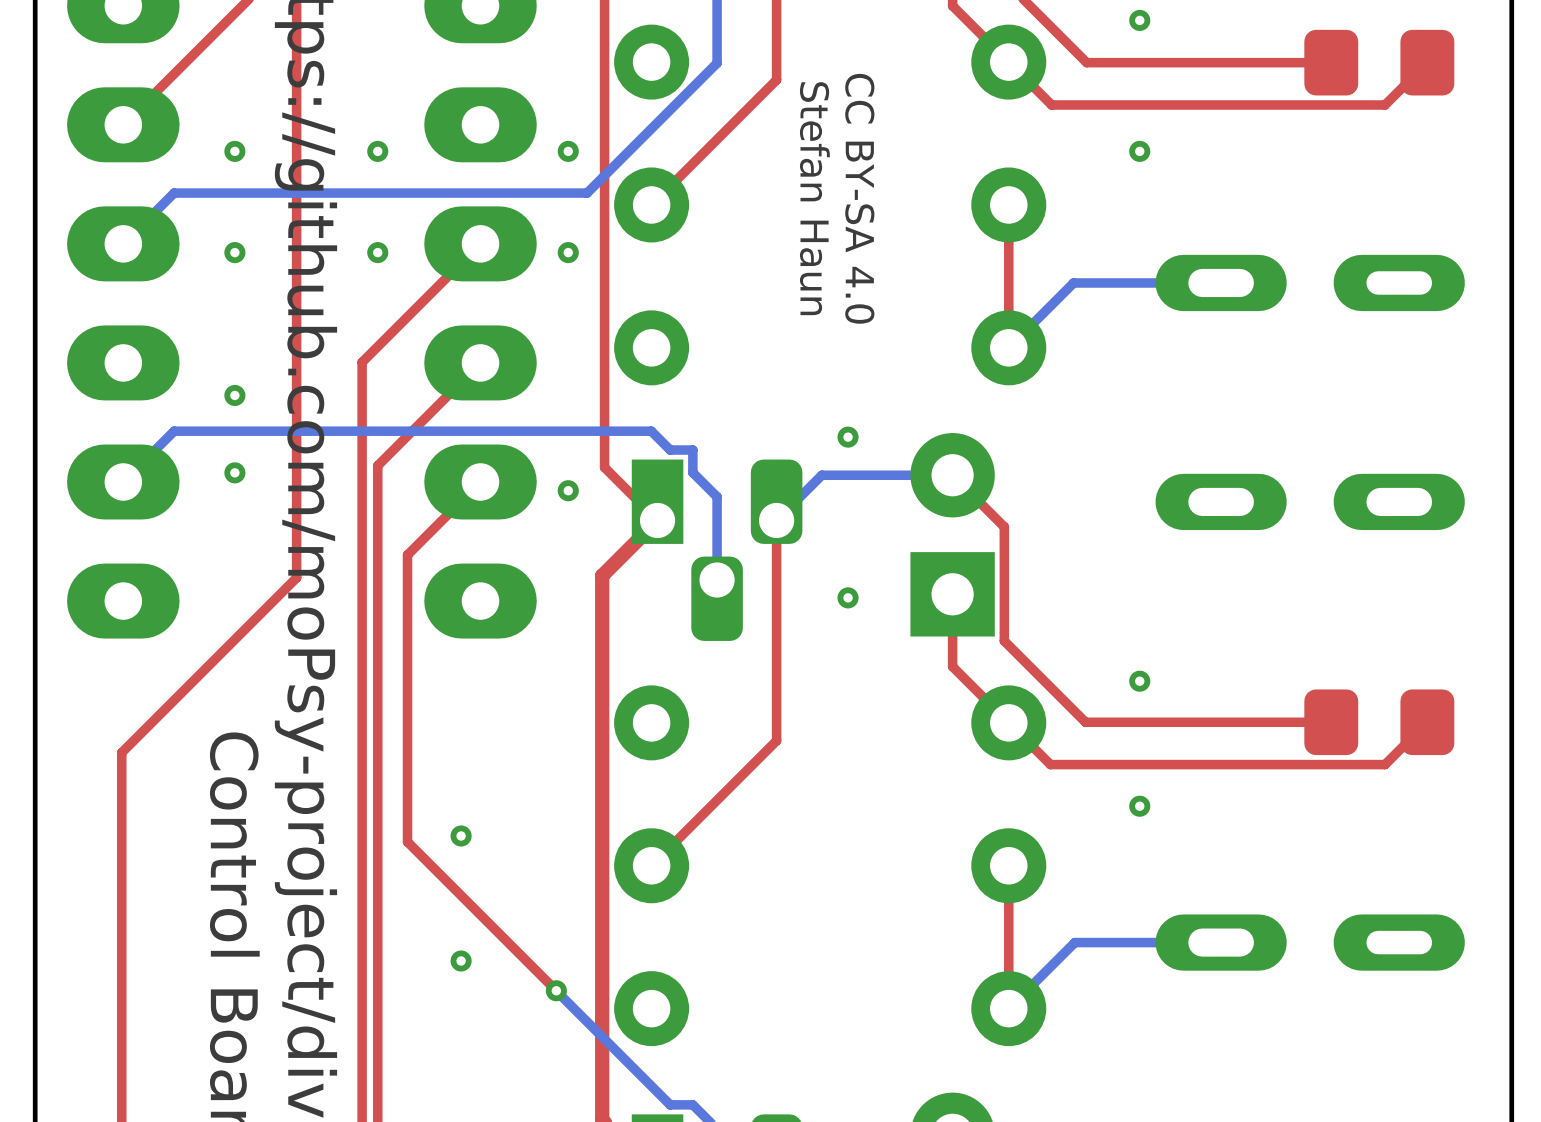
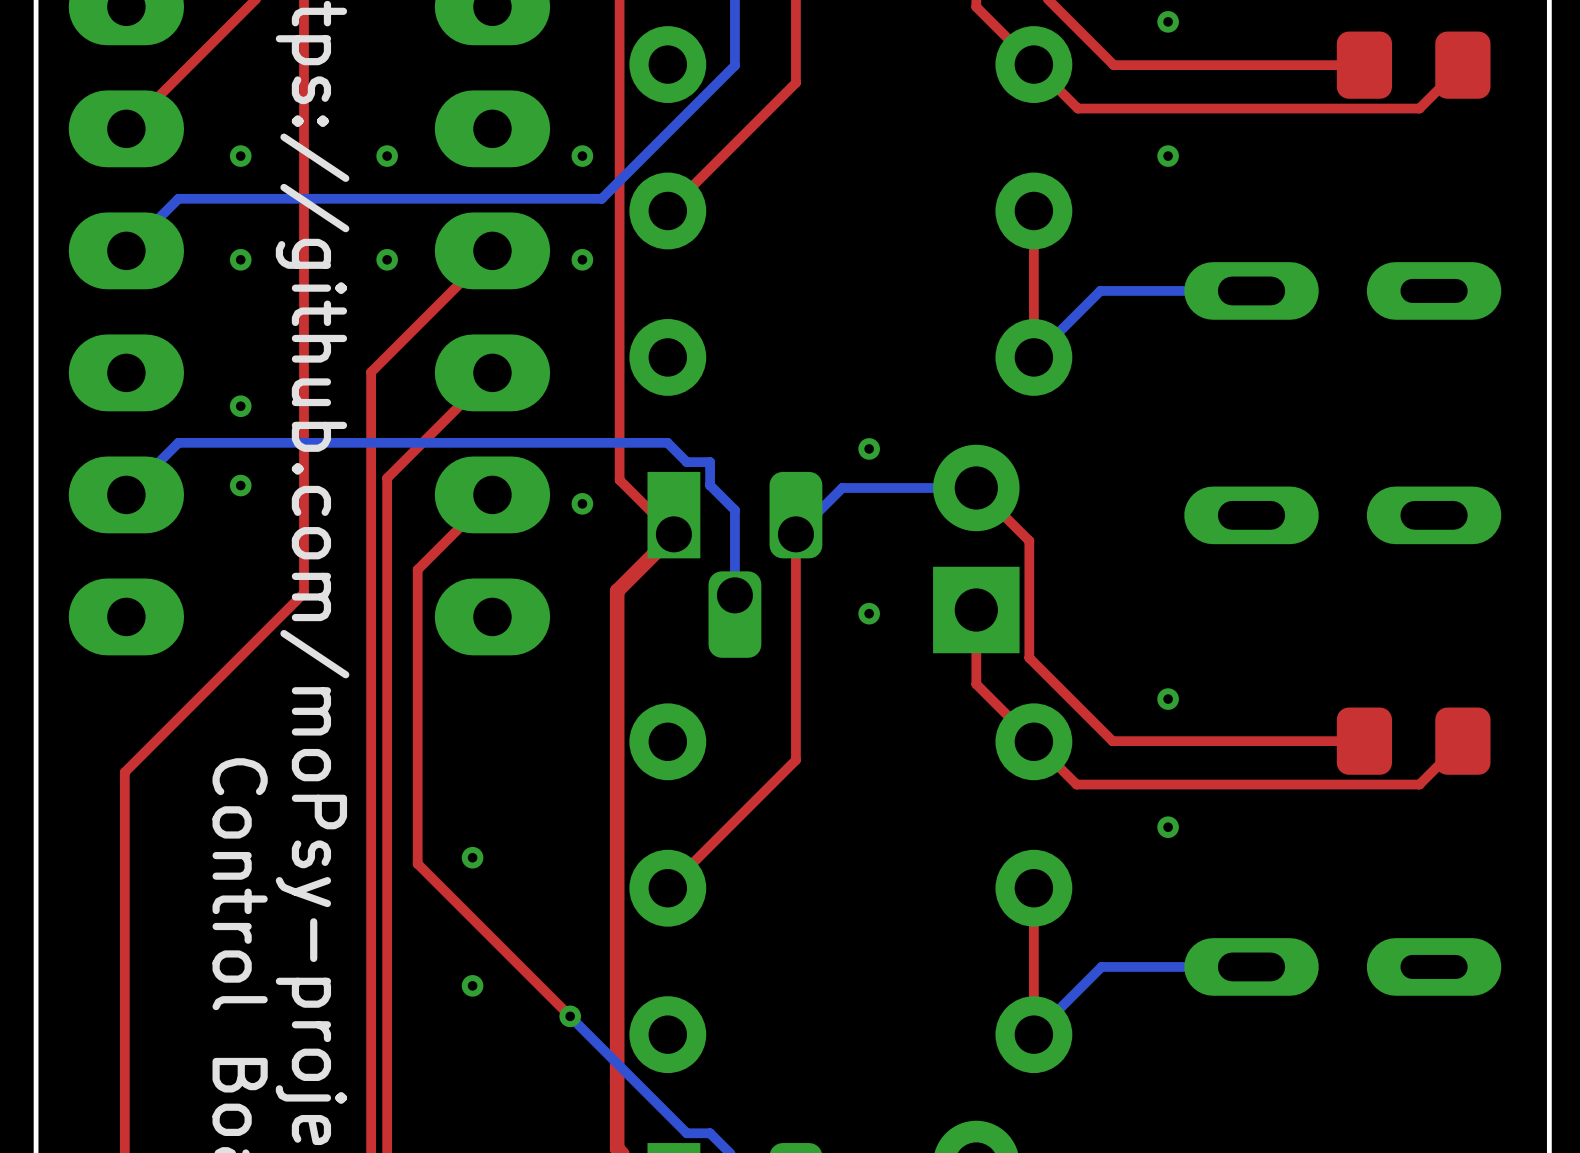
text: Stefan Haun (814, 198) -> none
text: CC BY-SA 4.0 (859, 198) -> none

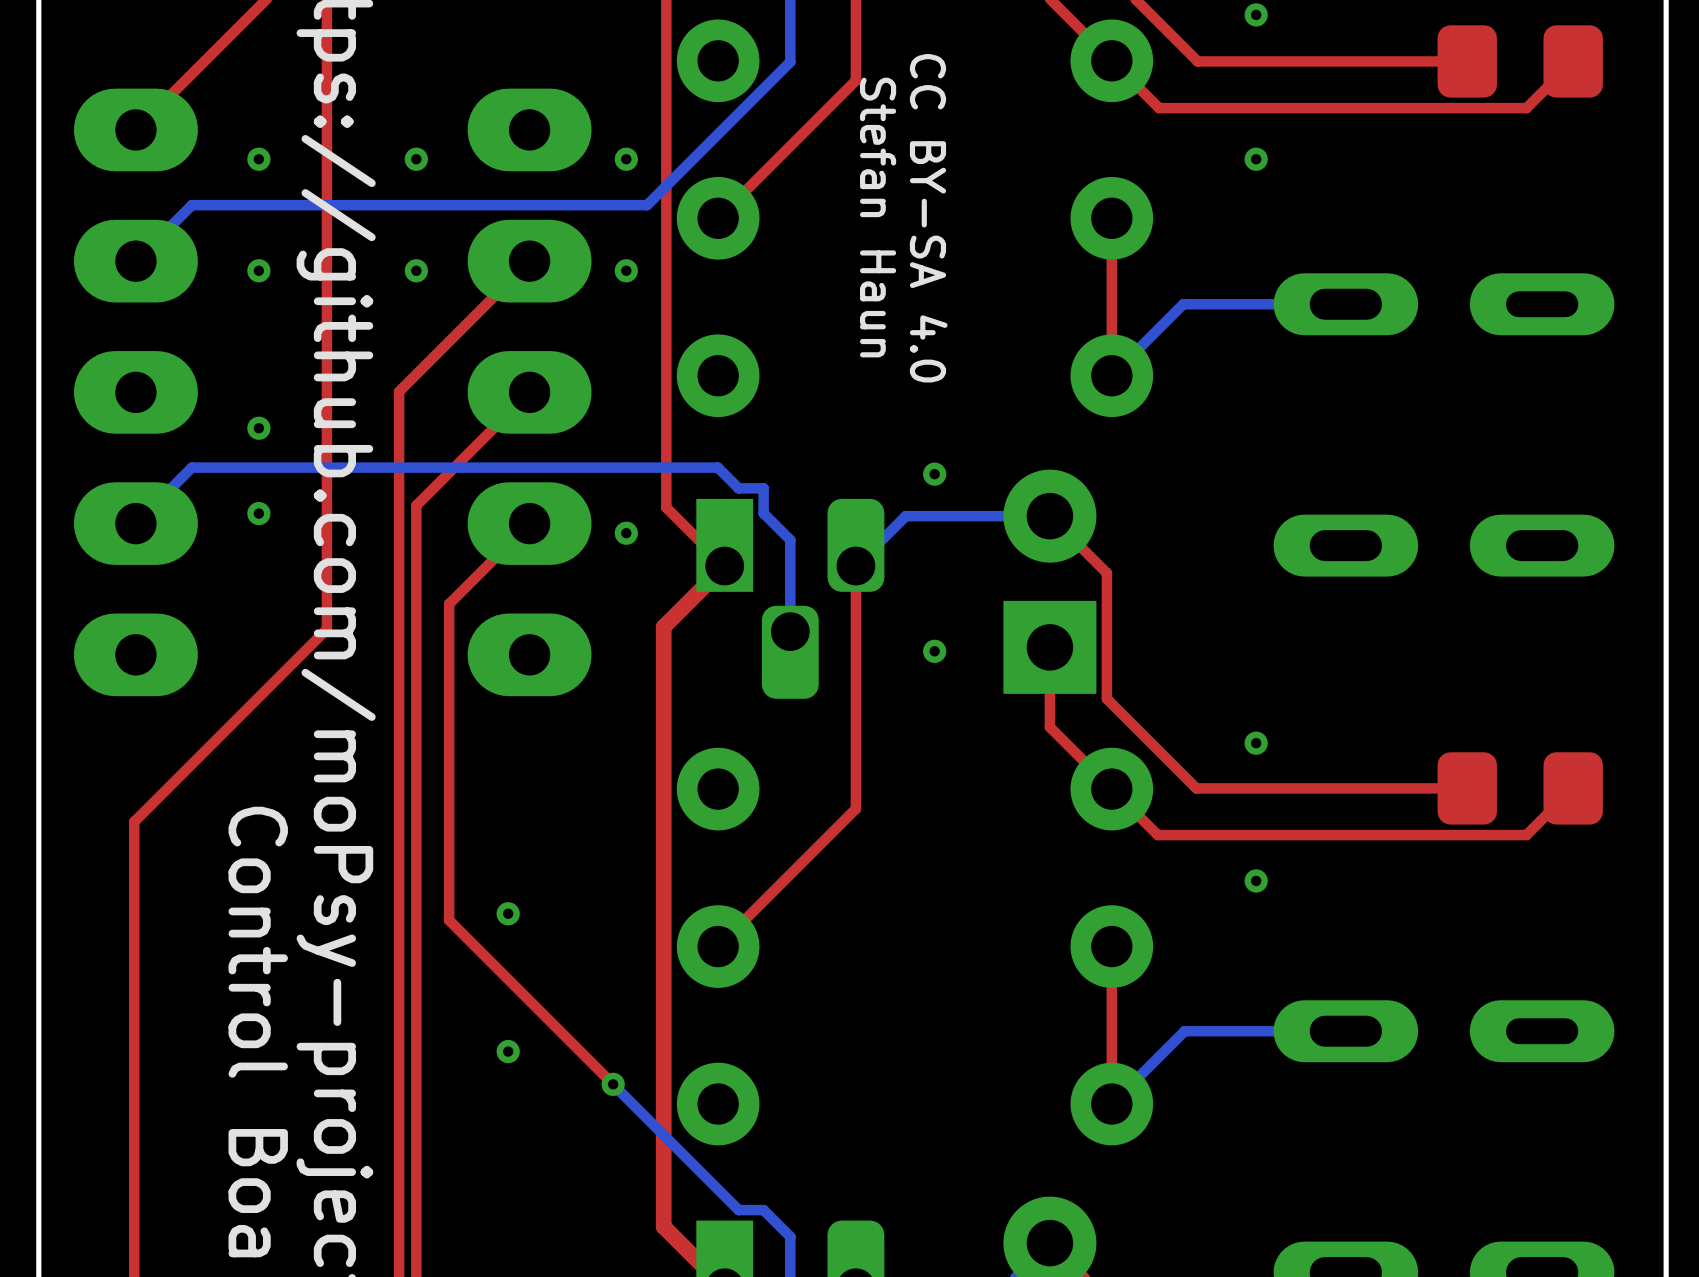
text: none -> Stefan Haun (878, 217)
text: none -> CC BY-SA 4.0 (928, 218)

